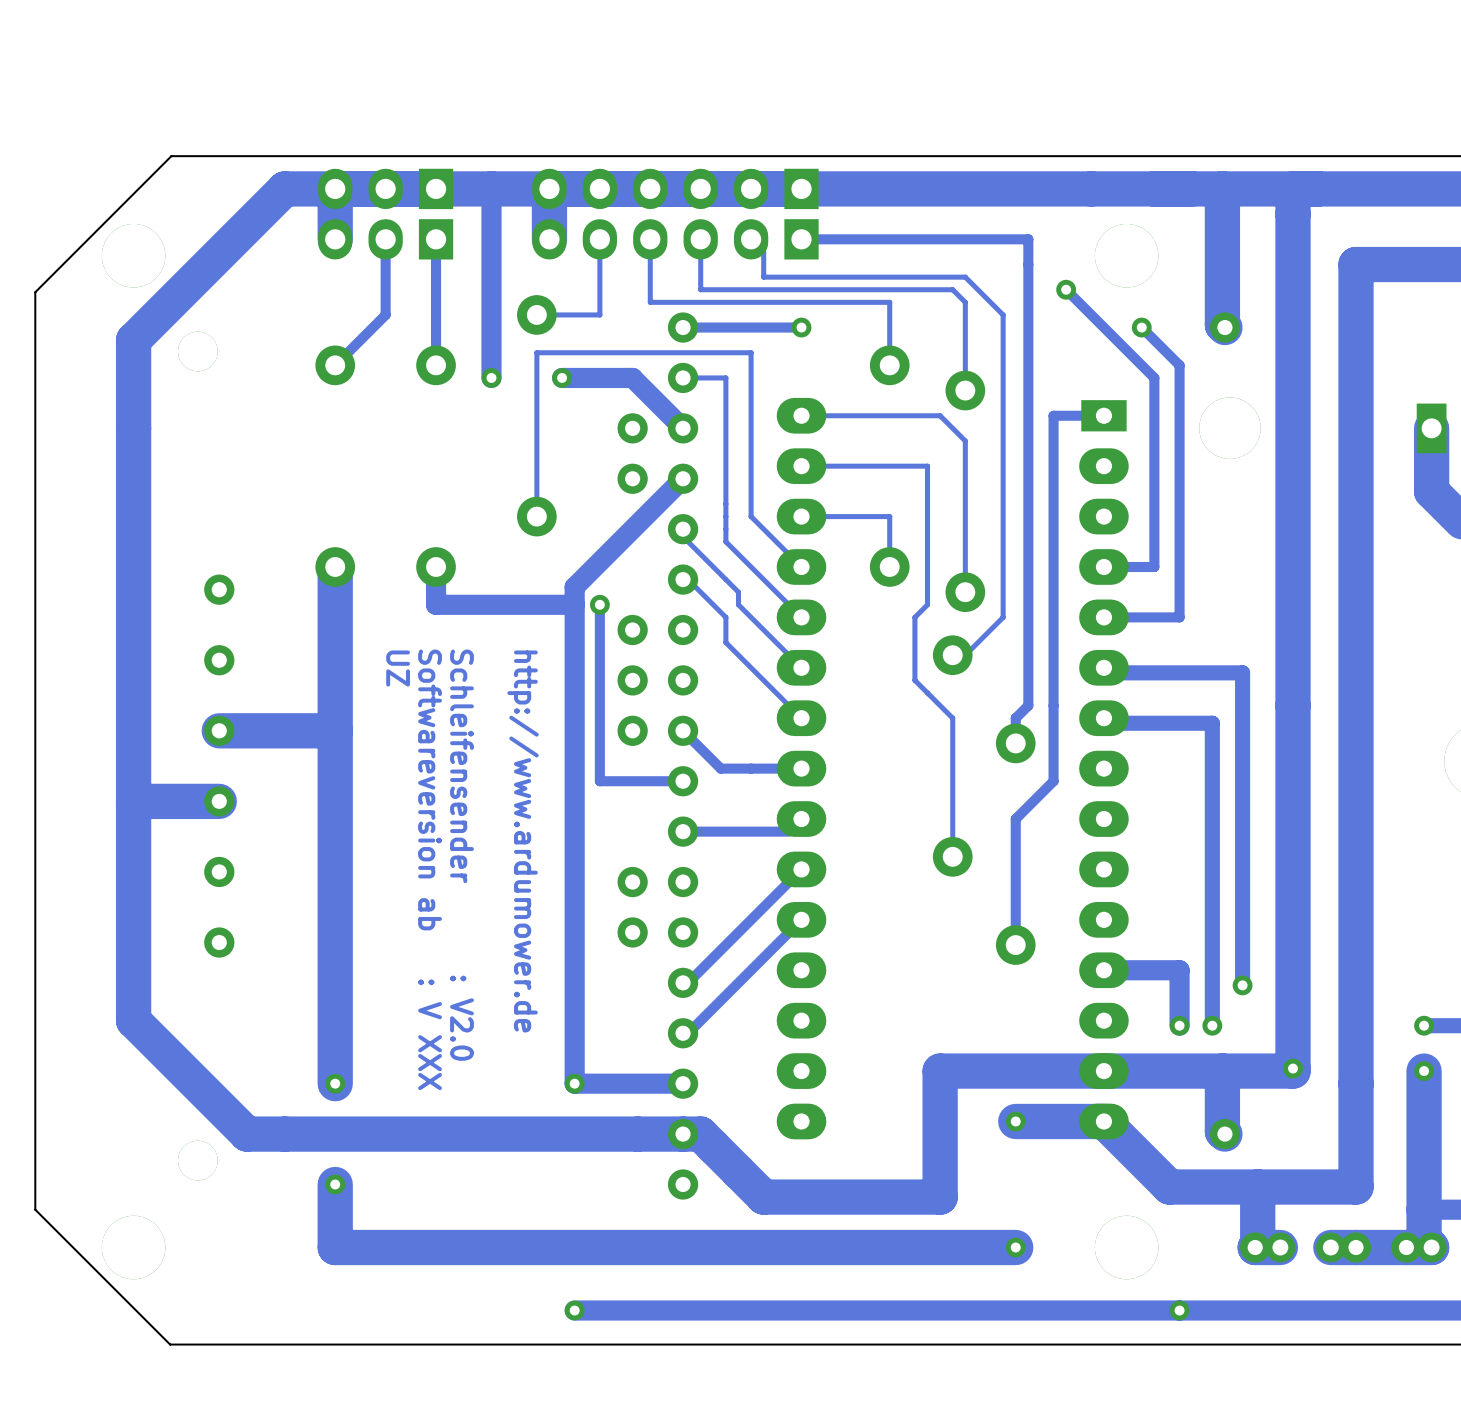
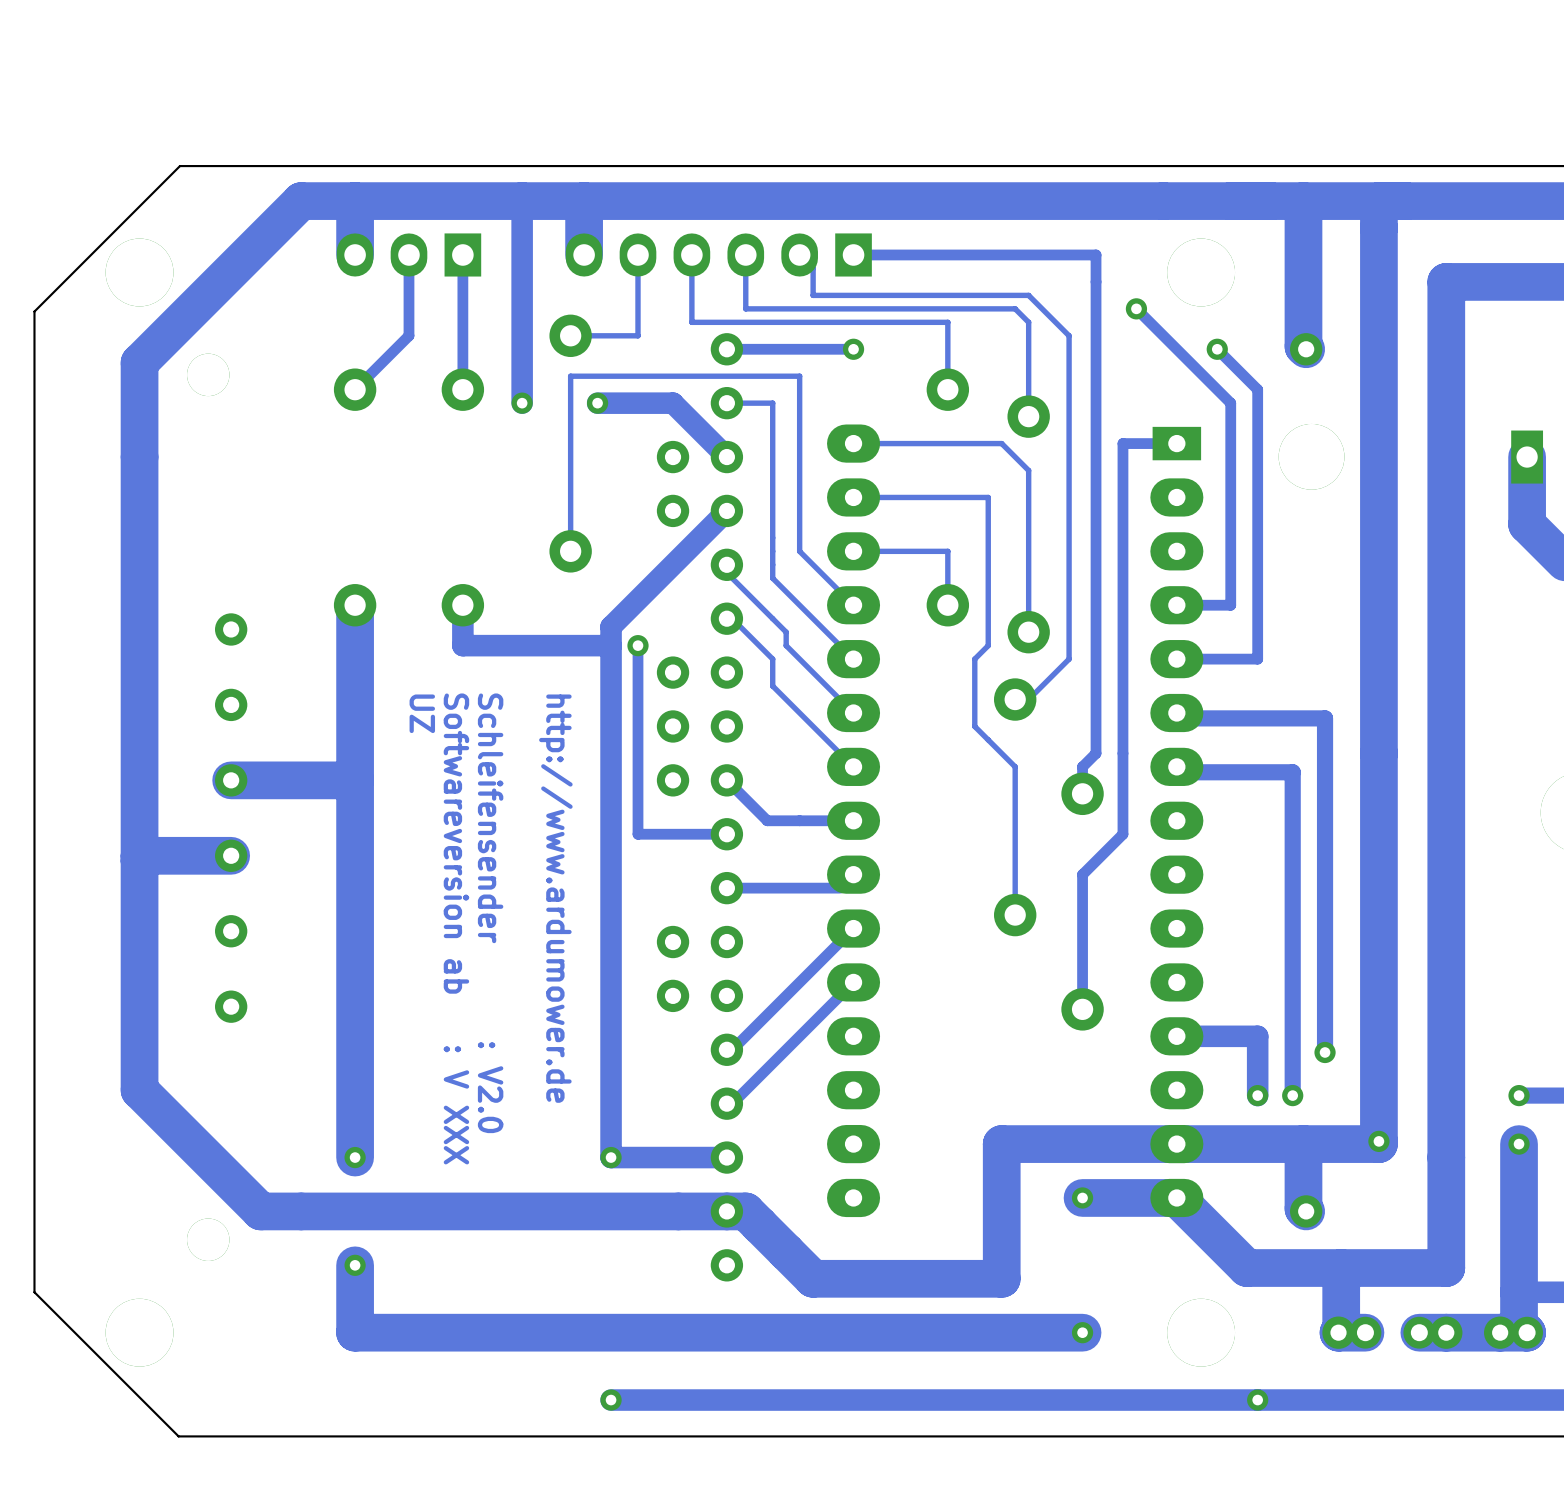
part: (385, 188) -> none
part: (675, 188) -> none

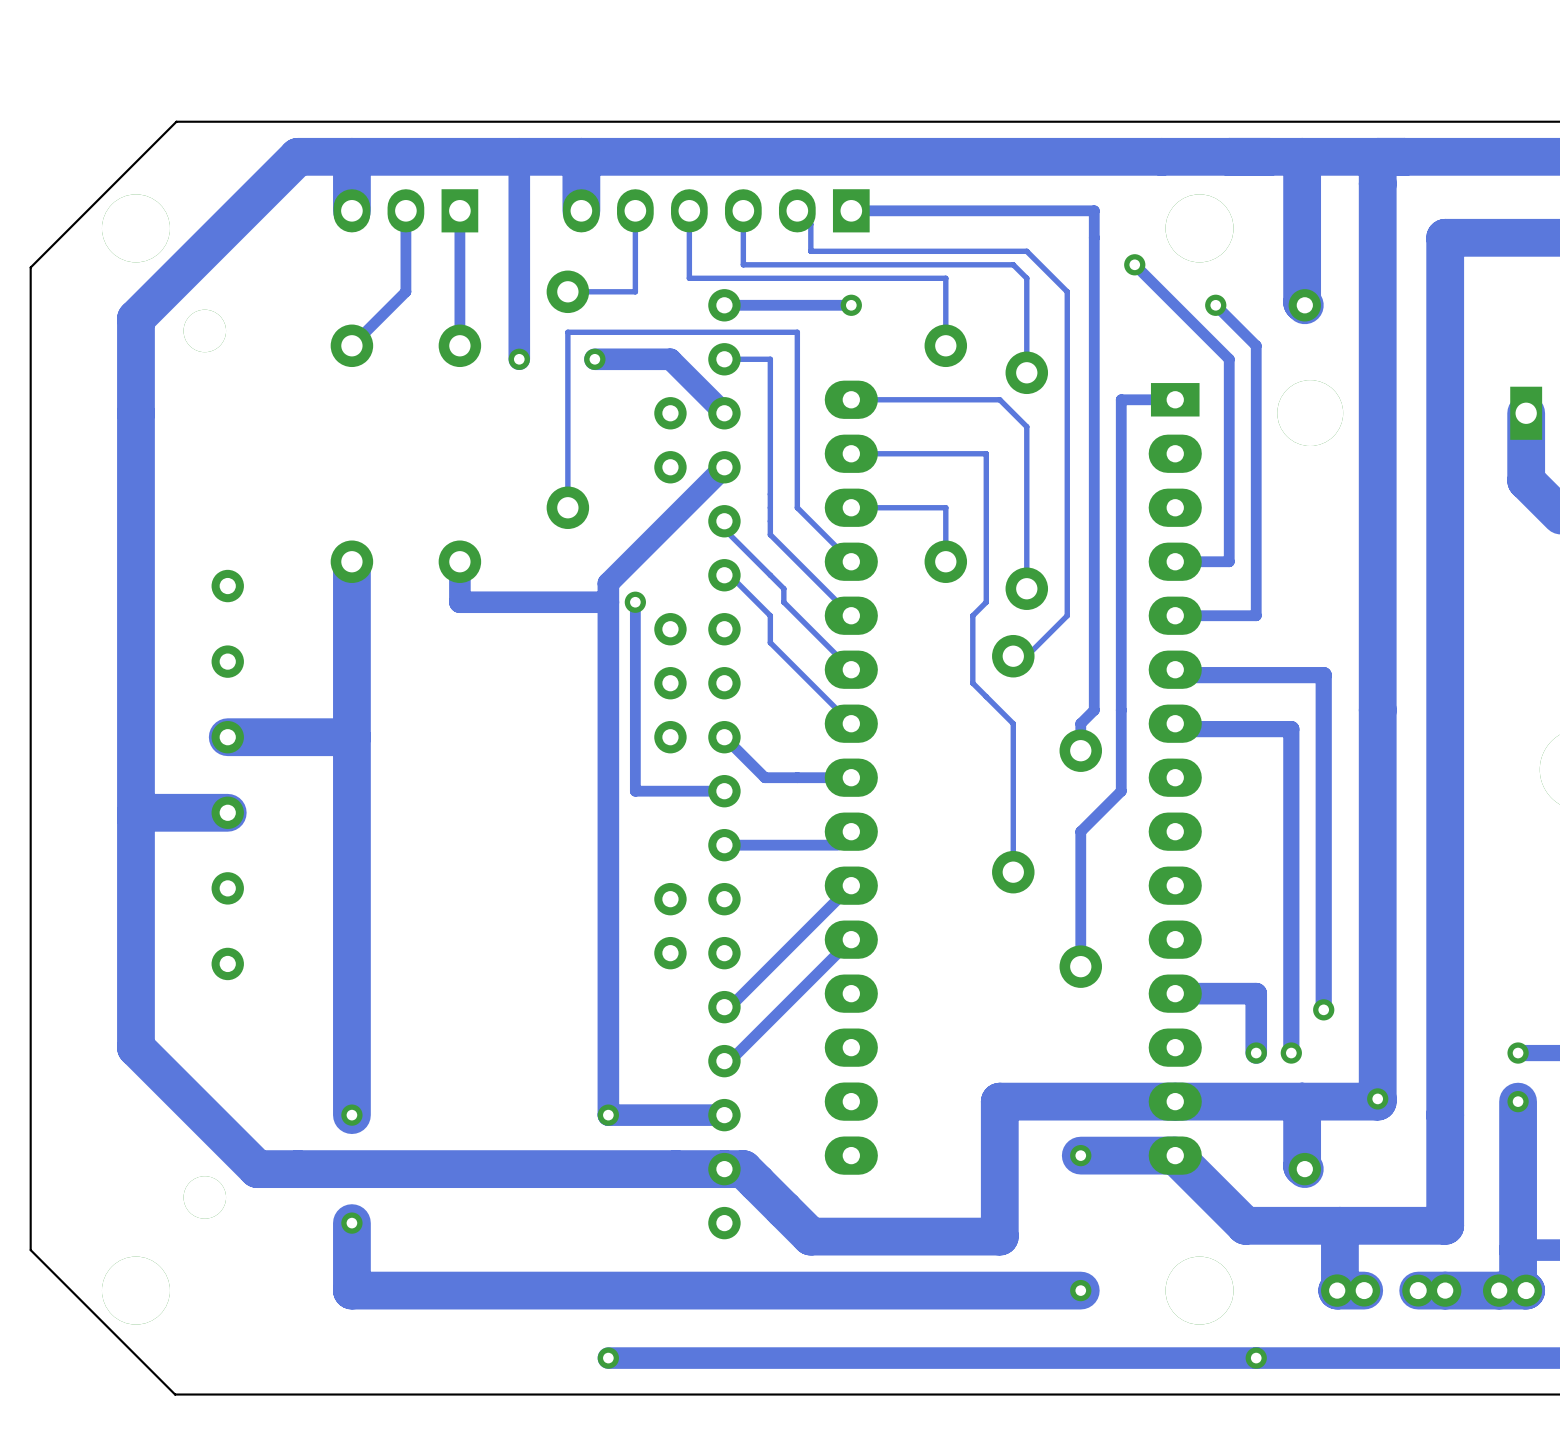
text: UZ (422, 713) -> none
text: http://www.ardumower.de (555, 898) -> none
text: Schleifensender : V2.0 (490, 913) -> none
text: Softwareversion ab : V XXX (456, 928) -> none

